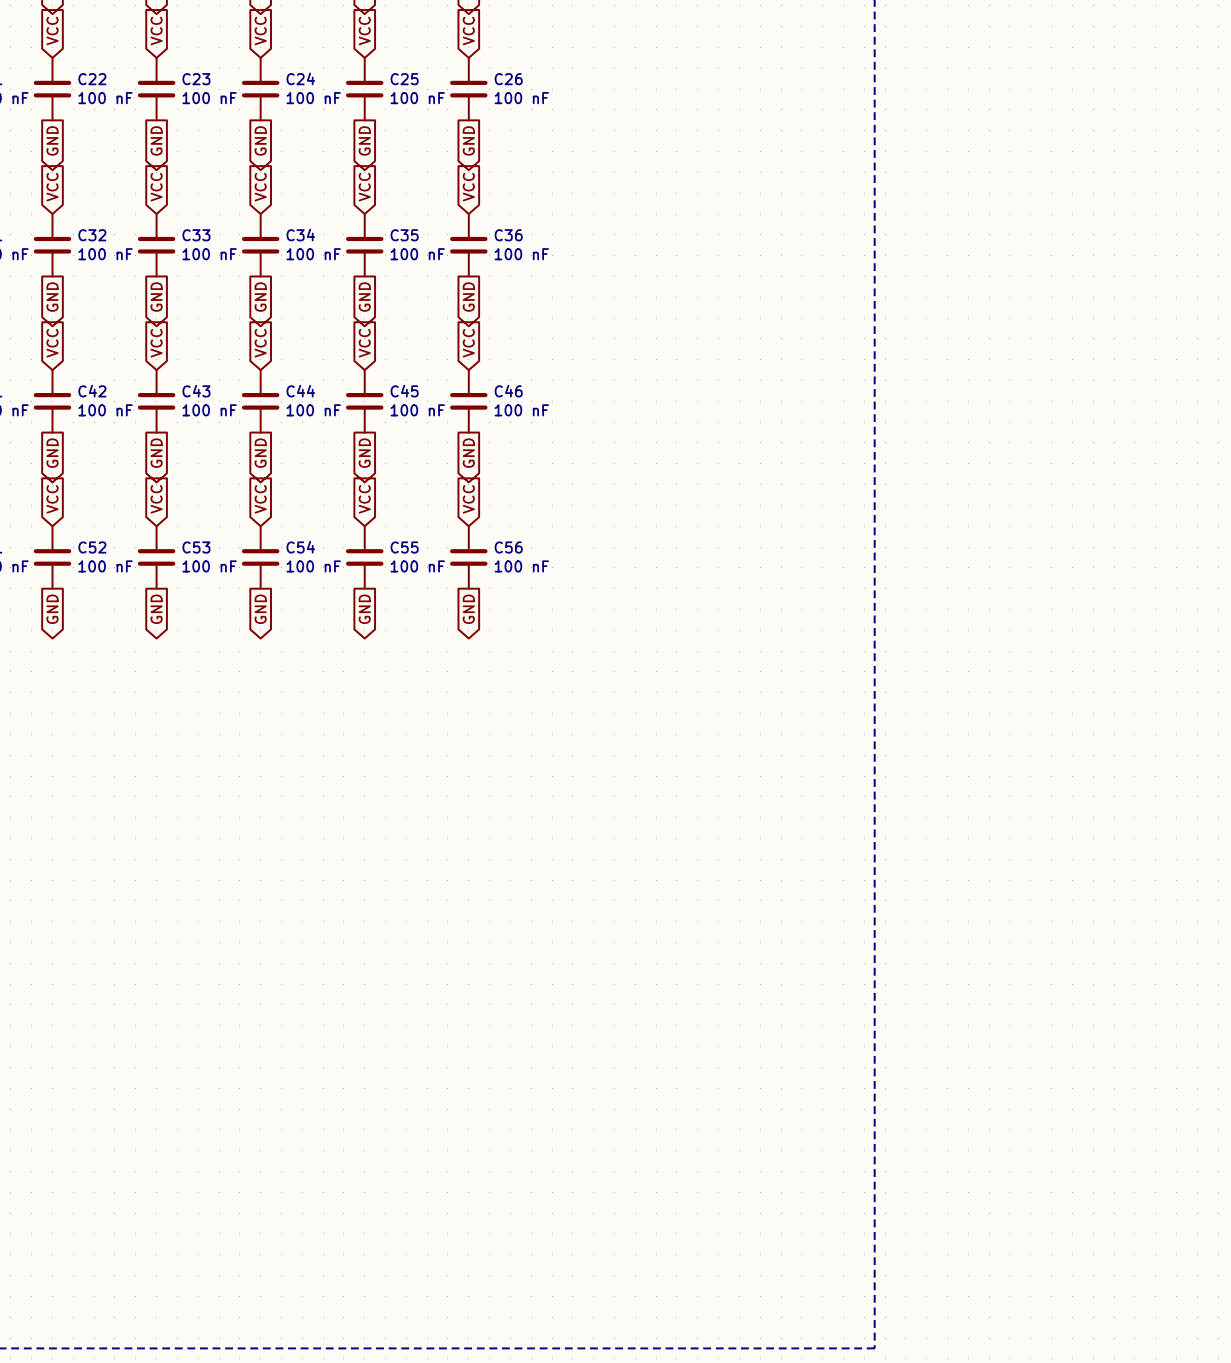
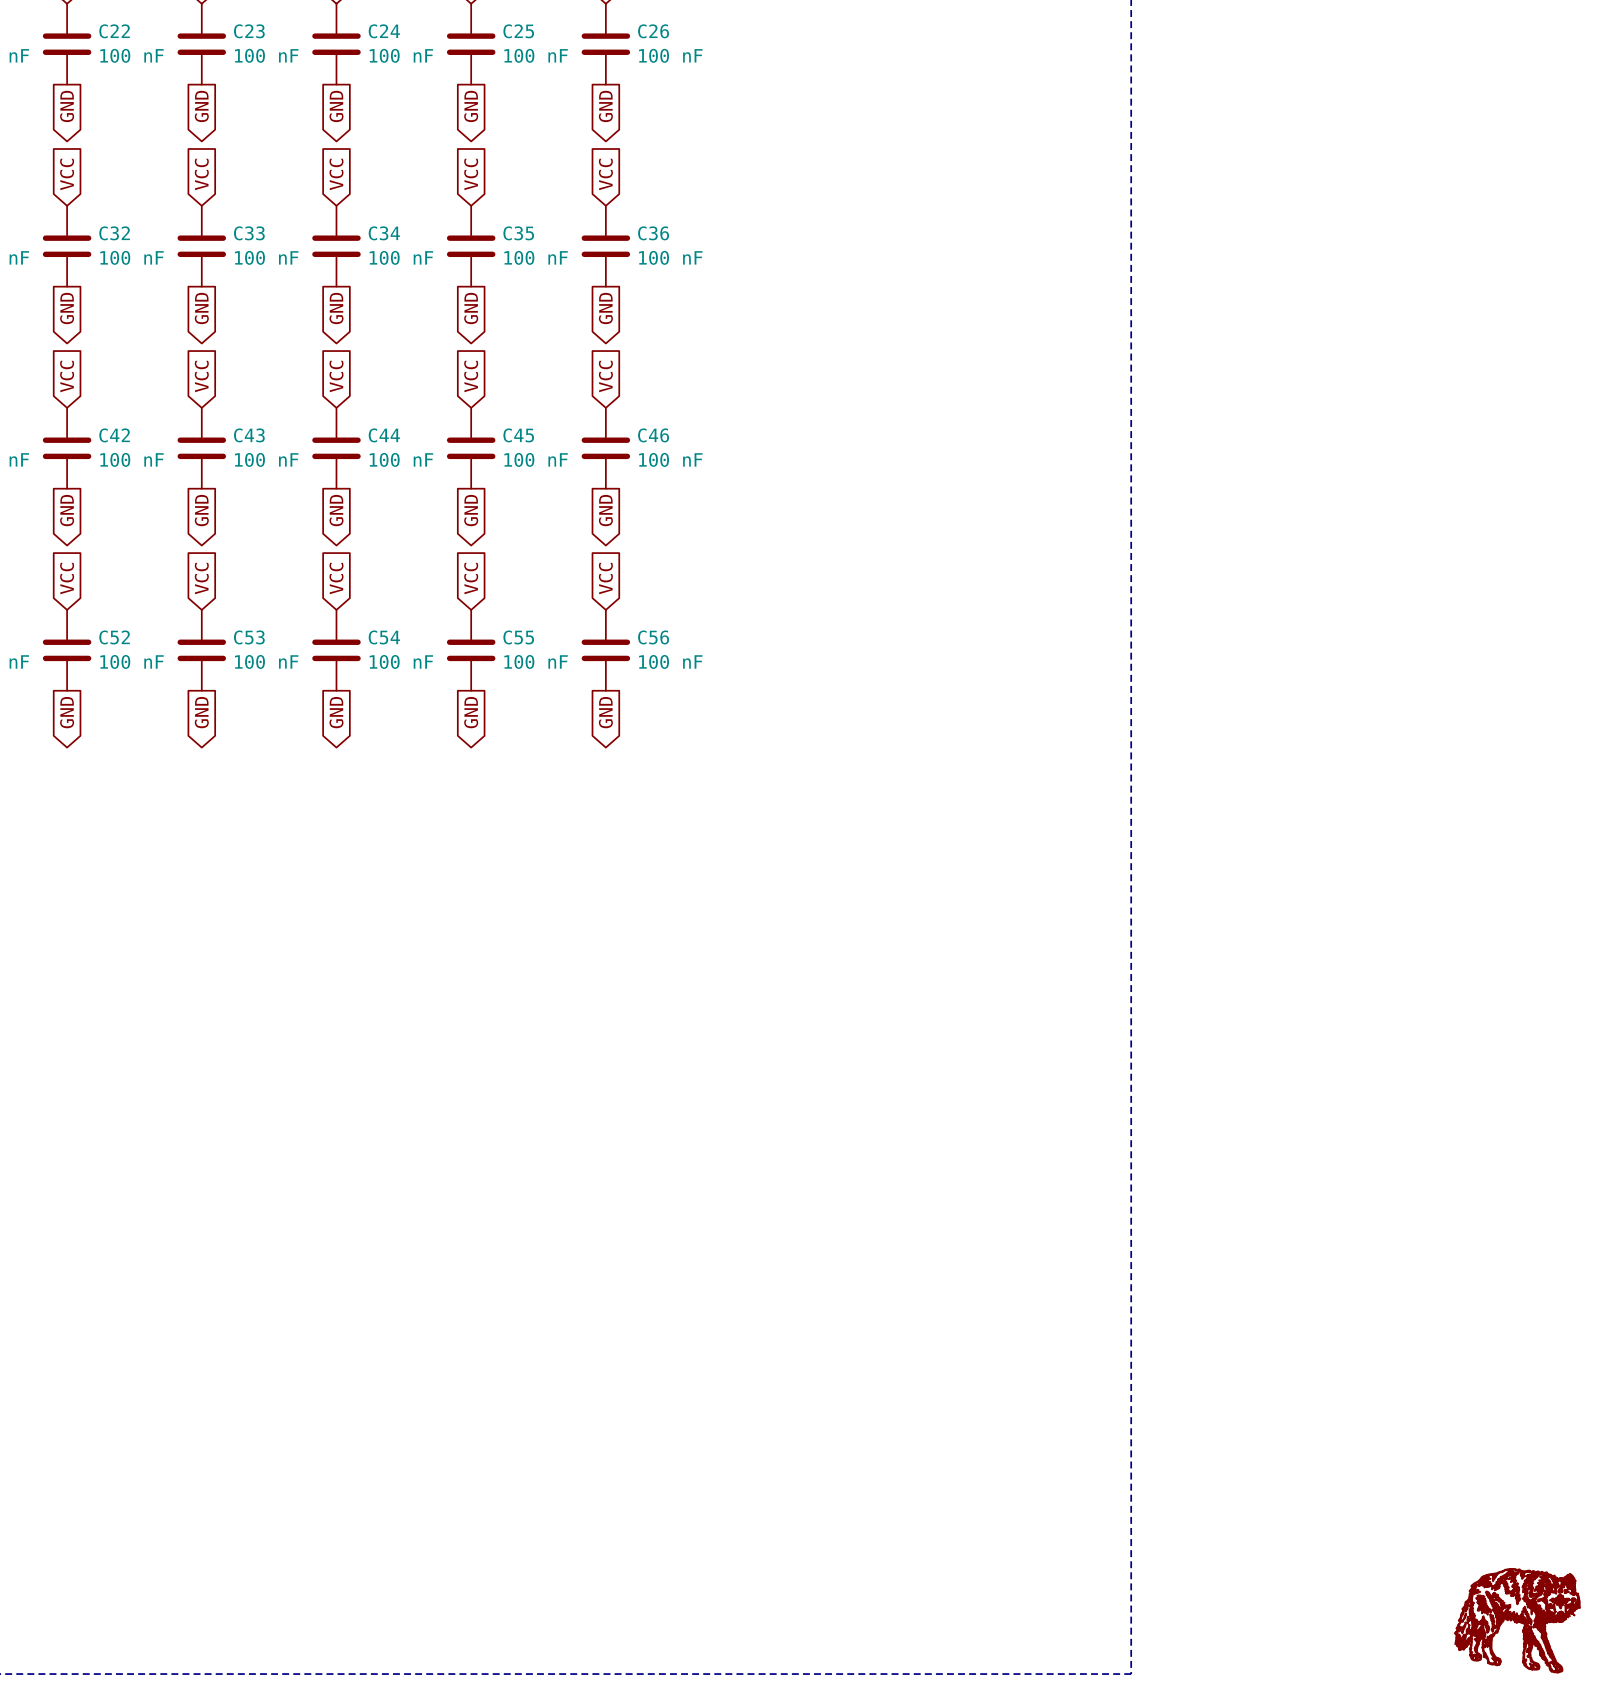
power symbol: none -> (1517, 1620)

